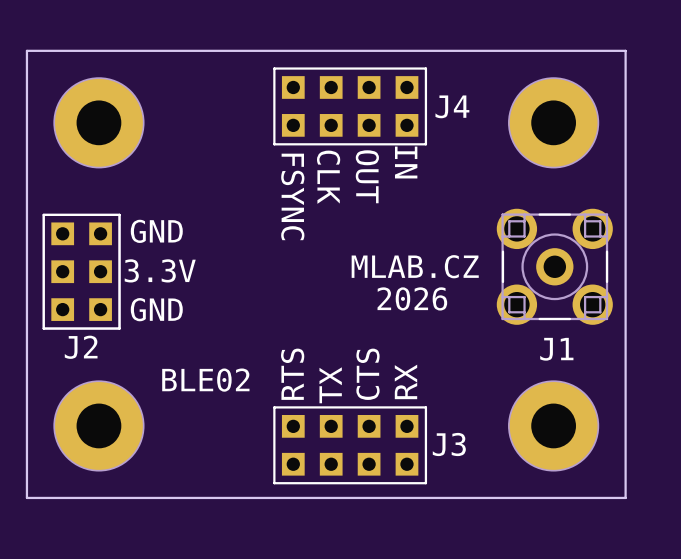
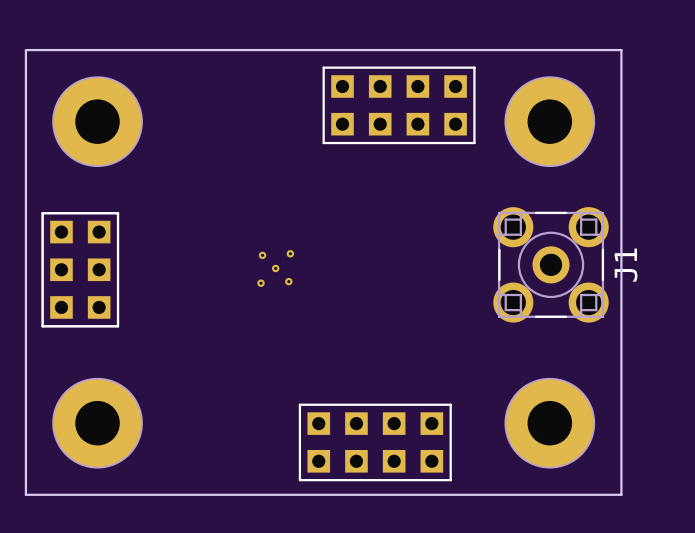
J4: (350, 106) -> none
part: none -> (399, 105)
text: IN (406, 162) -> none
text: OUT (367, 176) -> none
text: CLK (328, 177) -> none
text: FSYNC (292, 196) -> none
text: GND (156, 231) -> none
text: MLAB.CZ (415, 266) -> none
text: 3.3V (160, 270) -> none
part: none -> (275, 268)
text: 2026 (412, 298) -> none
text: GND (156, 309) -> none
J2 name: J2 (81, 347) -> none
J1 name rotation: 0° (556, 349) -> 90° counterclockwise (626, 265)
J1 name position: J1 (556, 349) -> J1 (626, 265)
text: RTS (292, 374) -> none
text: CTS (367, 374) -> none
text: BLE02 (205, 380) -> none
text: RX (405, 381) -> none
text: TX (330, 385) -> none
J3: (350, 445) -> none
part: none -> (375, 442)

